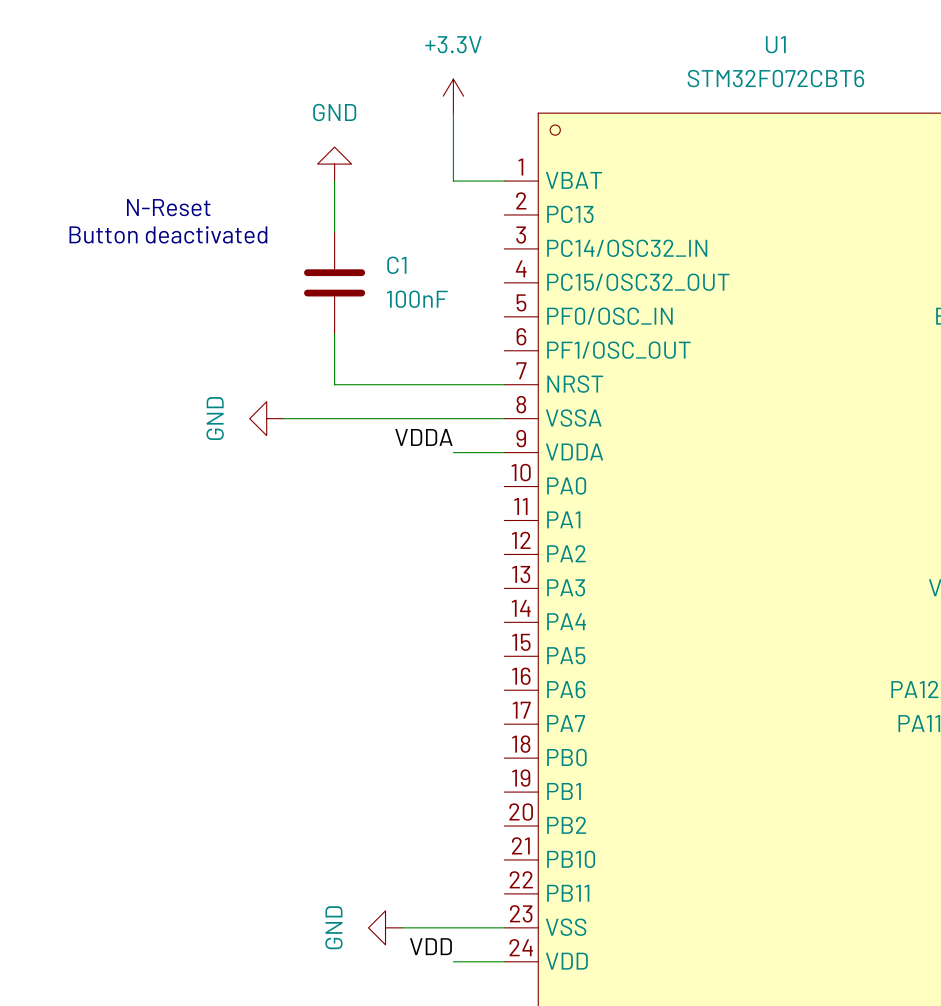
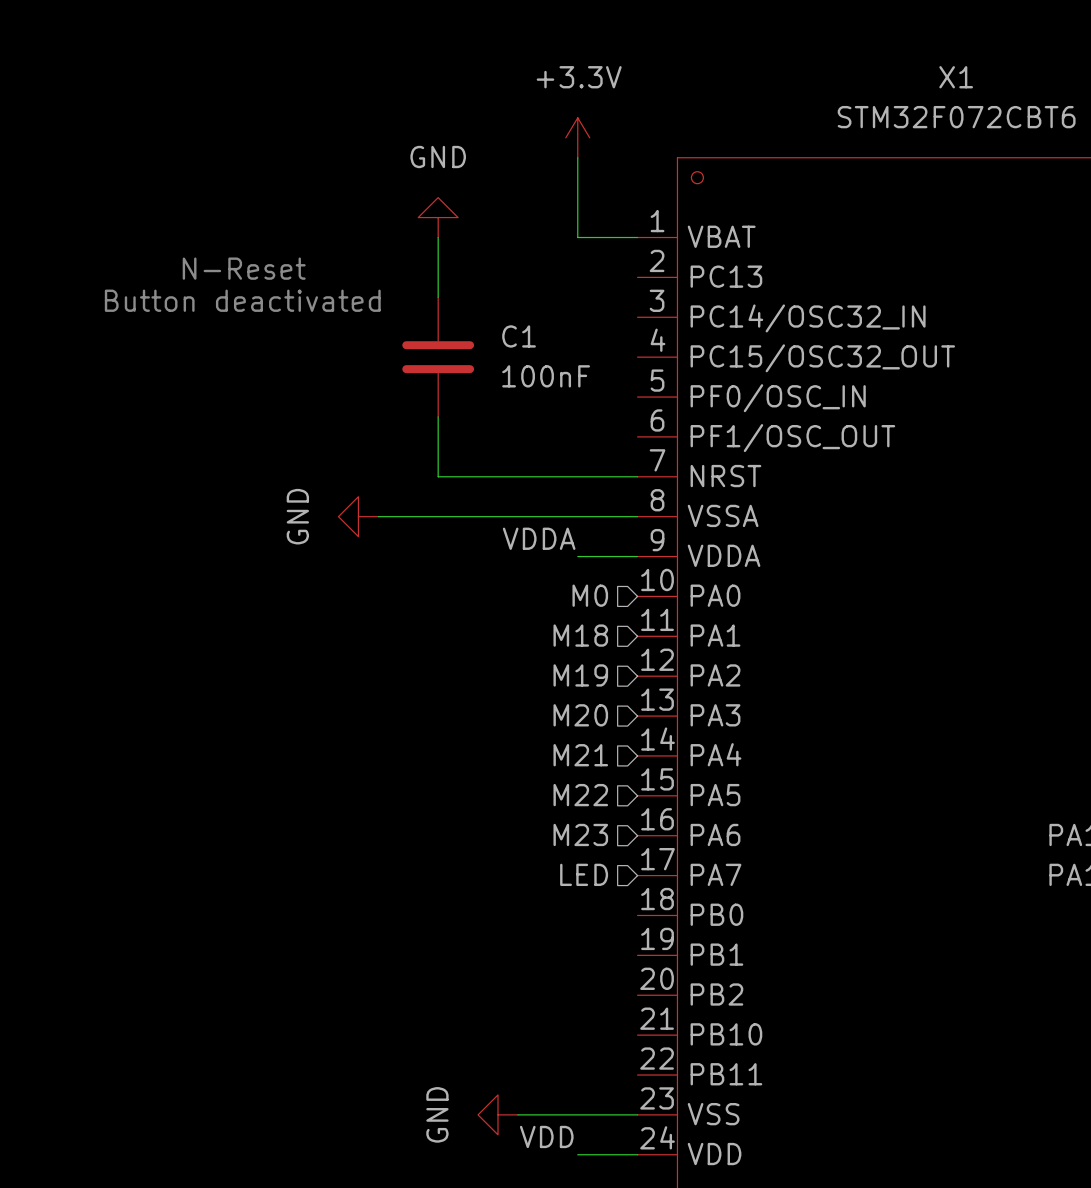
U1 name: U1 (775, 44) -> X1 (956, 77)
hierarchical label: none -> M0 (590, 595)
hierarchical label: none -> M18 (580, 635)
hierarchical label: none -> M19 (580, 675)
hierarchical label: none -> M20 (580, 715)
hierarchical label: none -> M21 (580, 755)
hierarchical label: none -> M22 (580, 795)
hierarchical label: none -> M23 (580, 834)
hierarchical label: none -> LED (584, 874)

